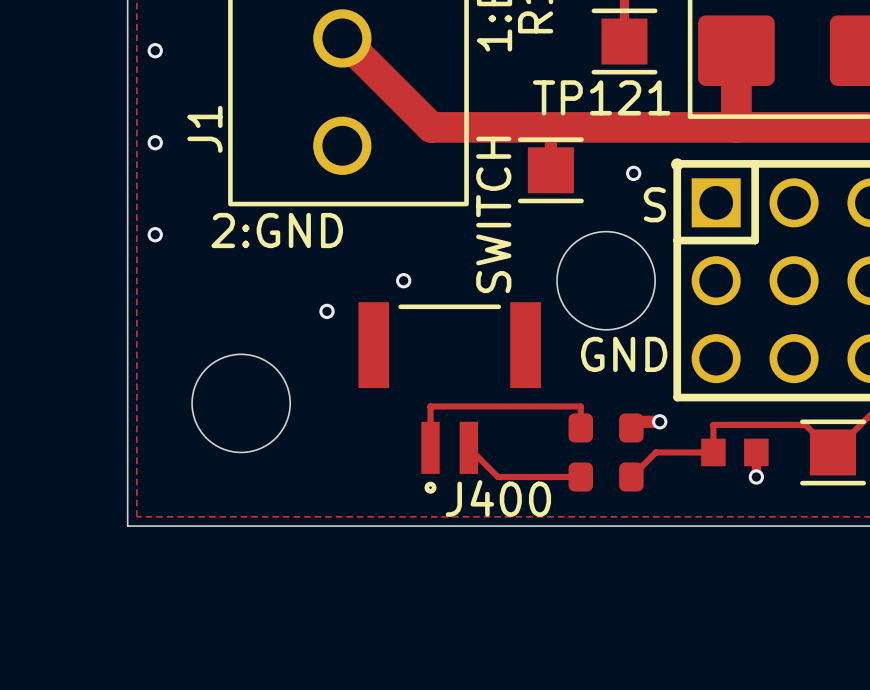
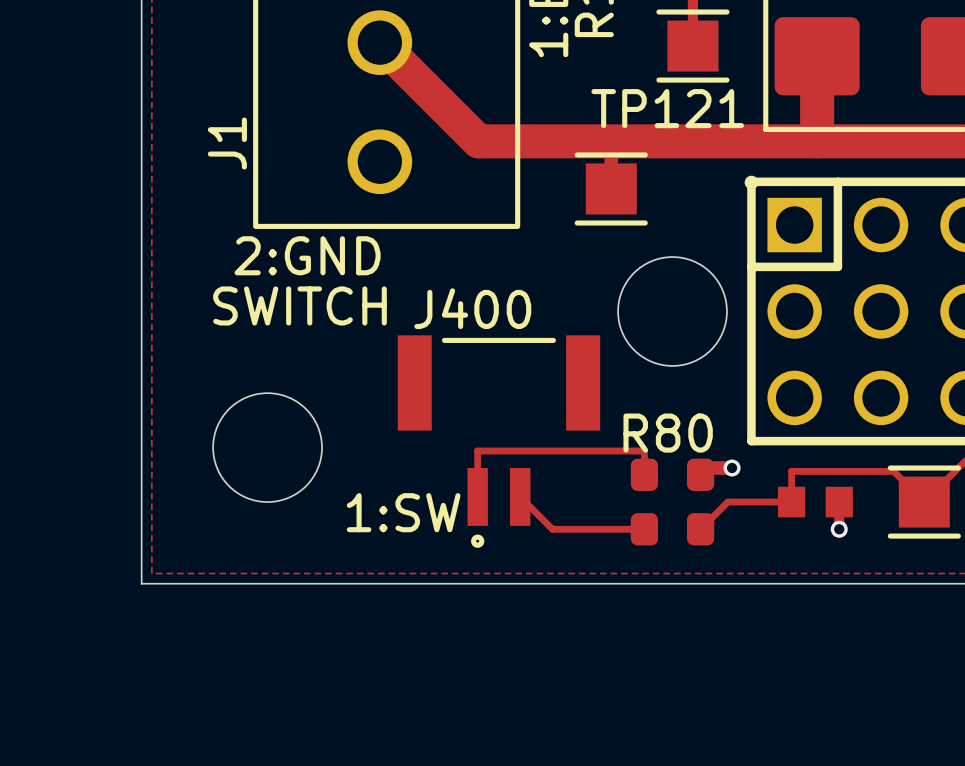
via: (155, 50) -> none
via: (155, 142) -> none
via: (633, 173) -> none
text: S (654, 204) -> none
text rotation: 0° (493, 214) -> 90° clockwise (300, 305)
text position: SWITCH (493, 214) -> SWITCH (300, 305)
via: (155, 234) -> none
via: (403, 280) -> none
via: (327, 311) -> none
text: GND (624, 354) -> none
R80 name: none -> R80 (668, 433)
text: none -> 1:SW (403, 512)
J400 name position: J400 (498, 498) -> J400 (472, 308)

